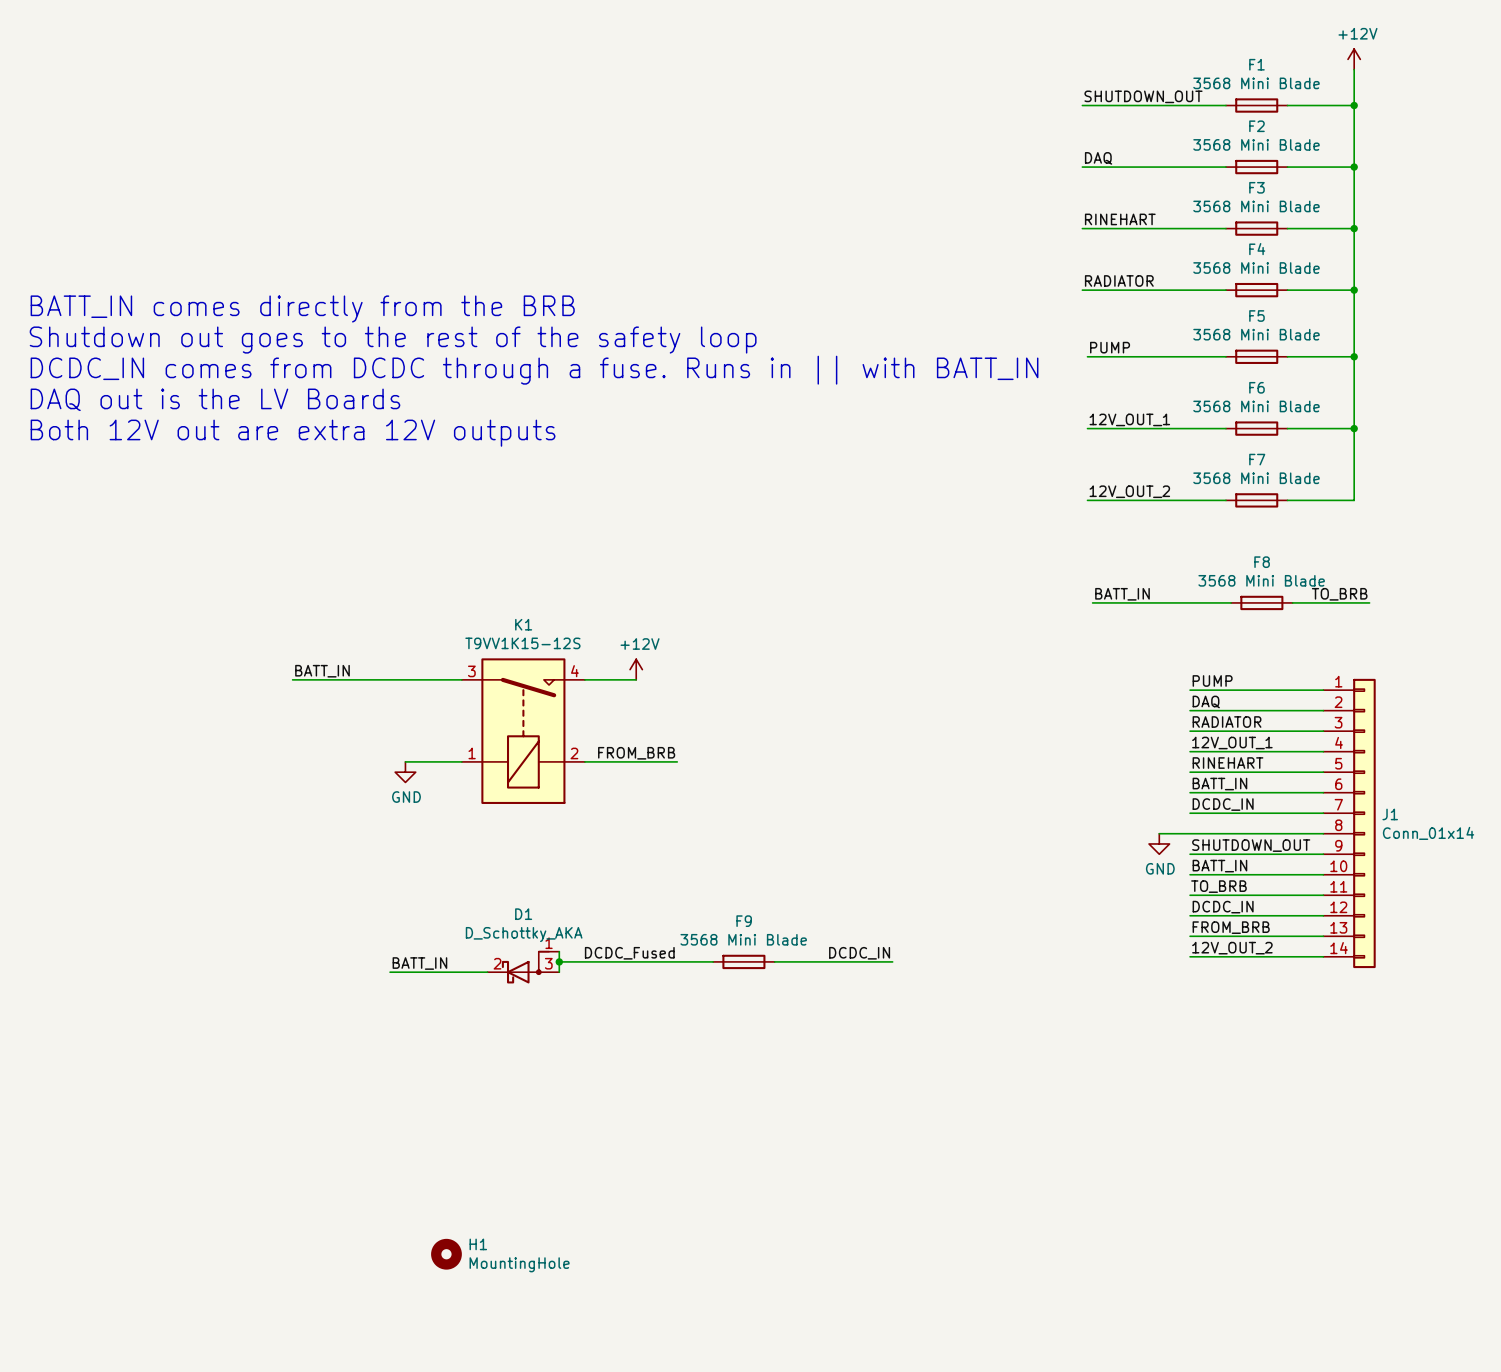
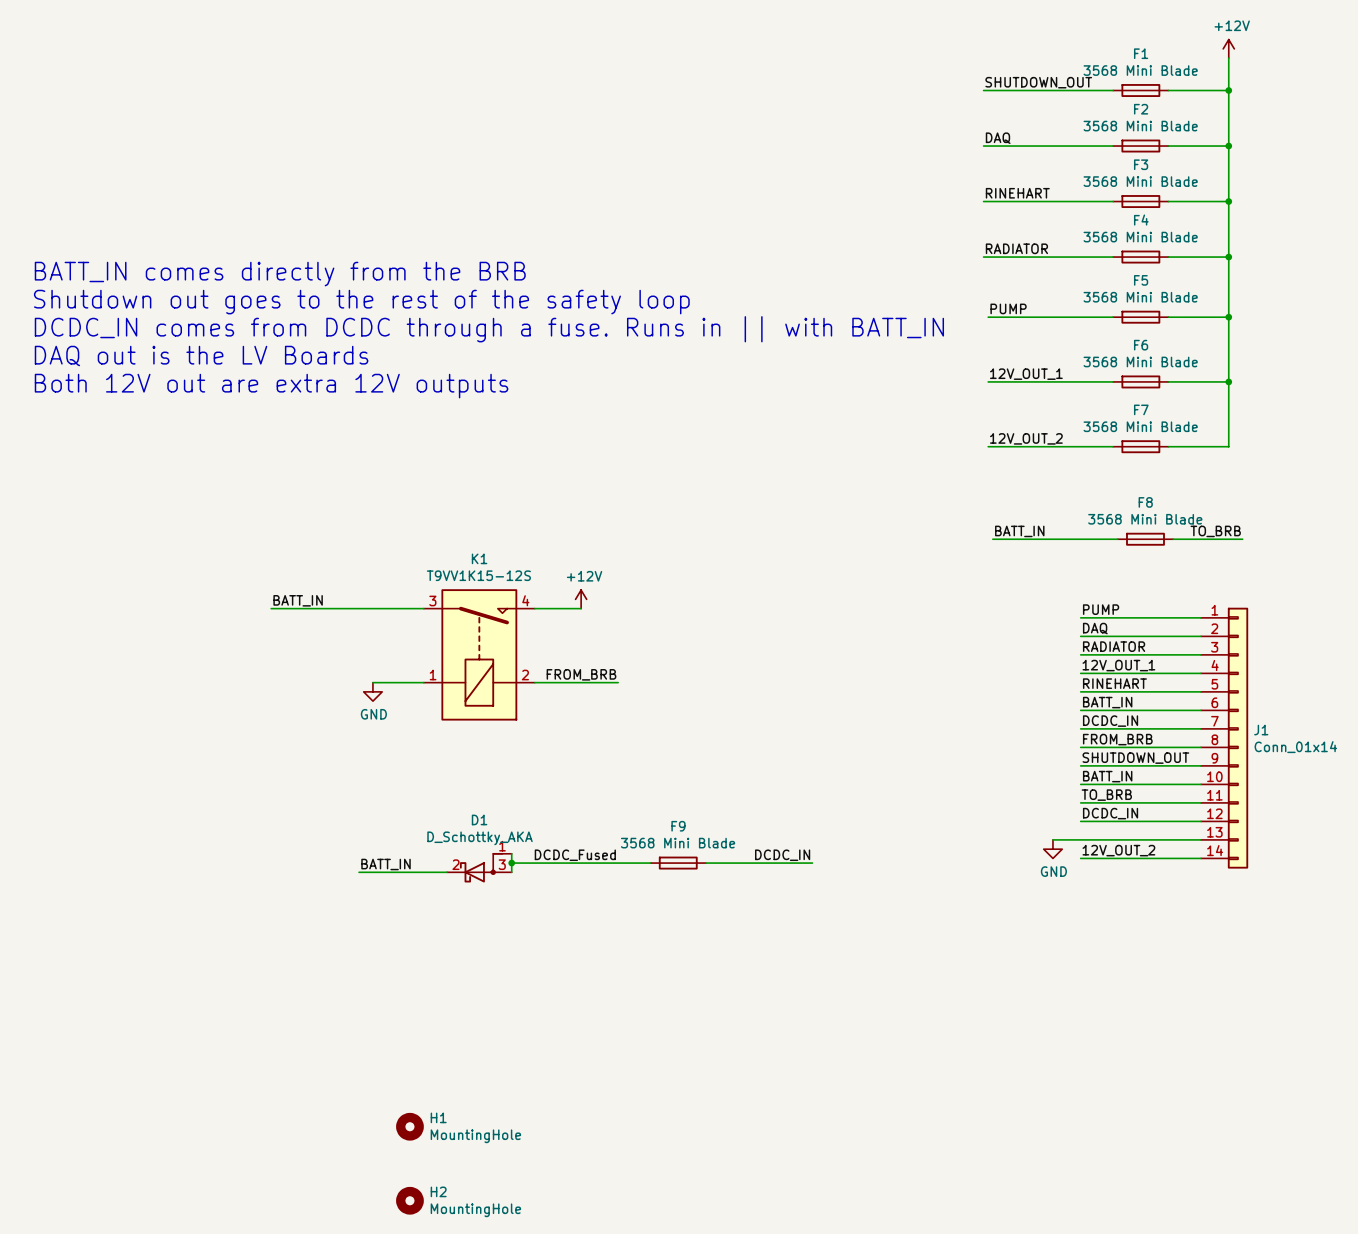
wire: (1159, 833) (1190, 833) -> (1052, 839) (1080, 839)
power symbol position: GND (1159, 843) -> GND (1052, 849)
label position: FROM_BRB (1231, 927) -> FROM_BRB (1117, 739)
H2: none -> MountingHole (409, 1200)

